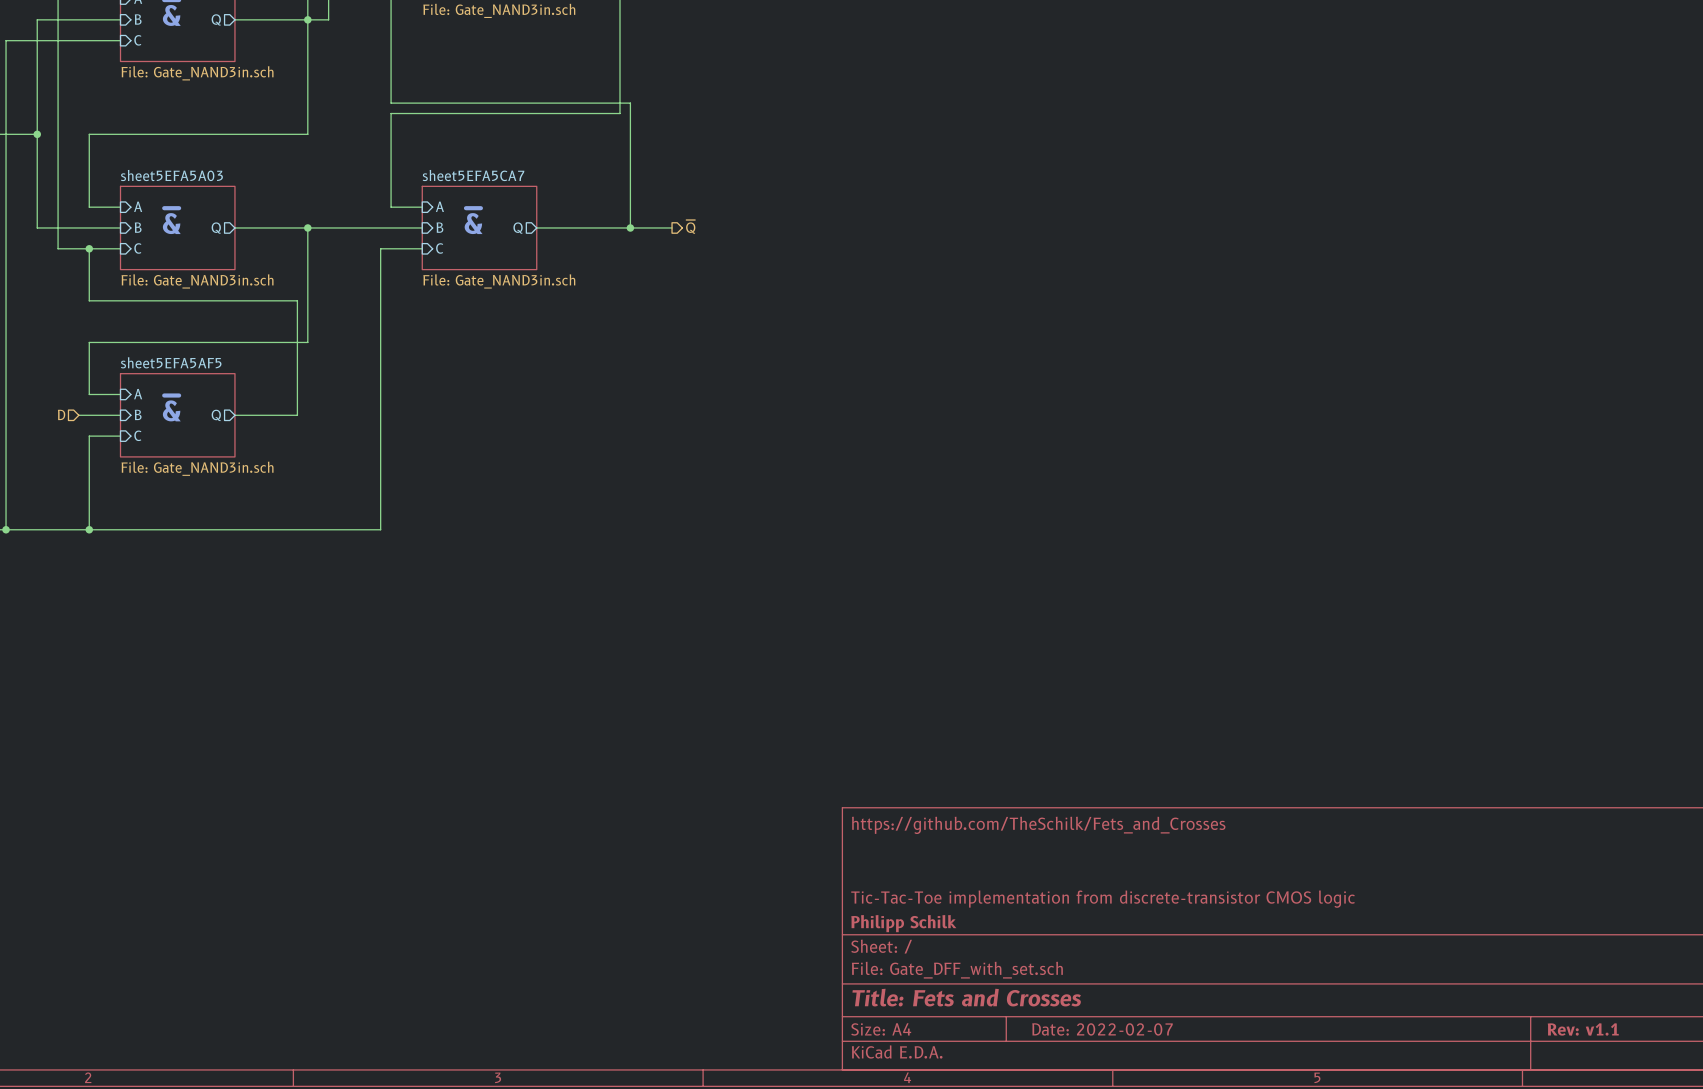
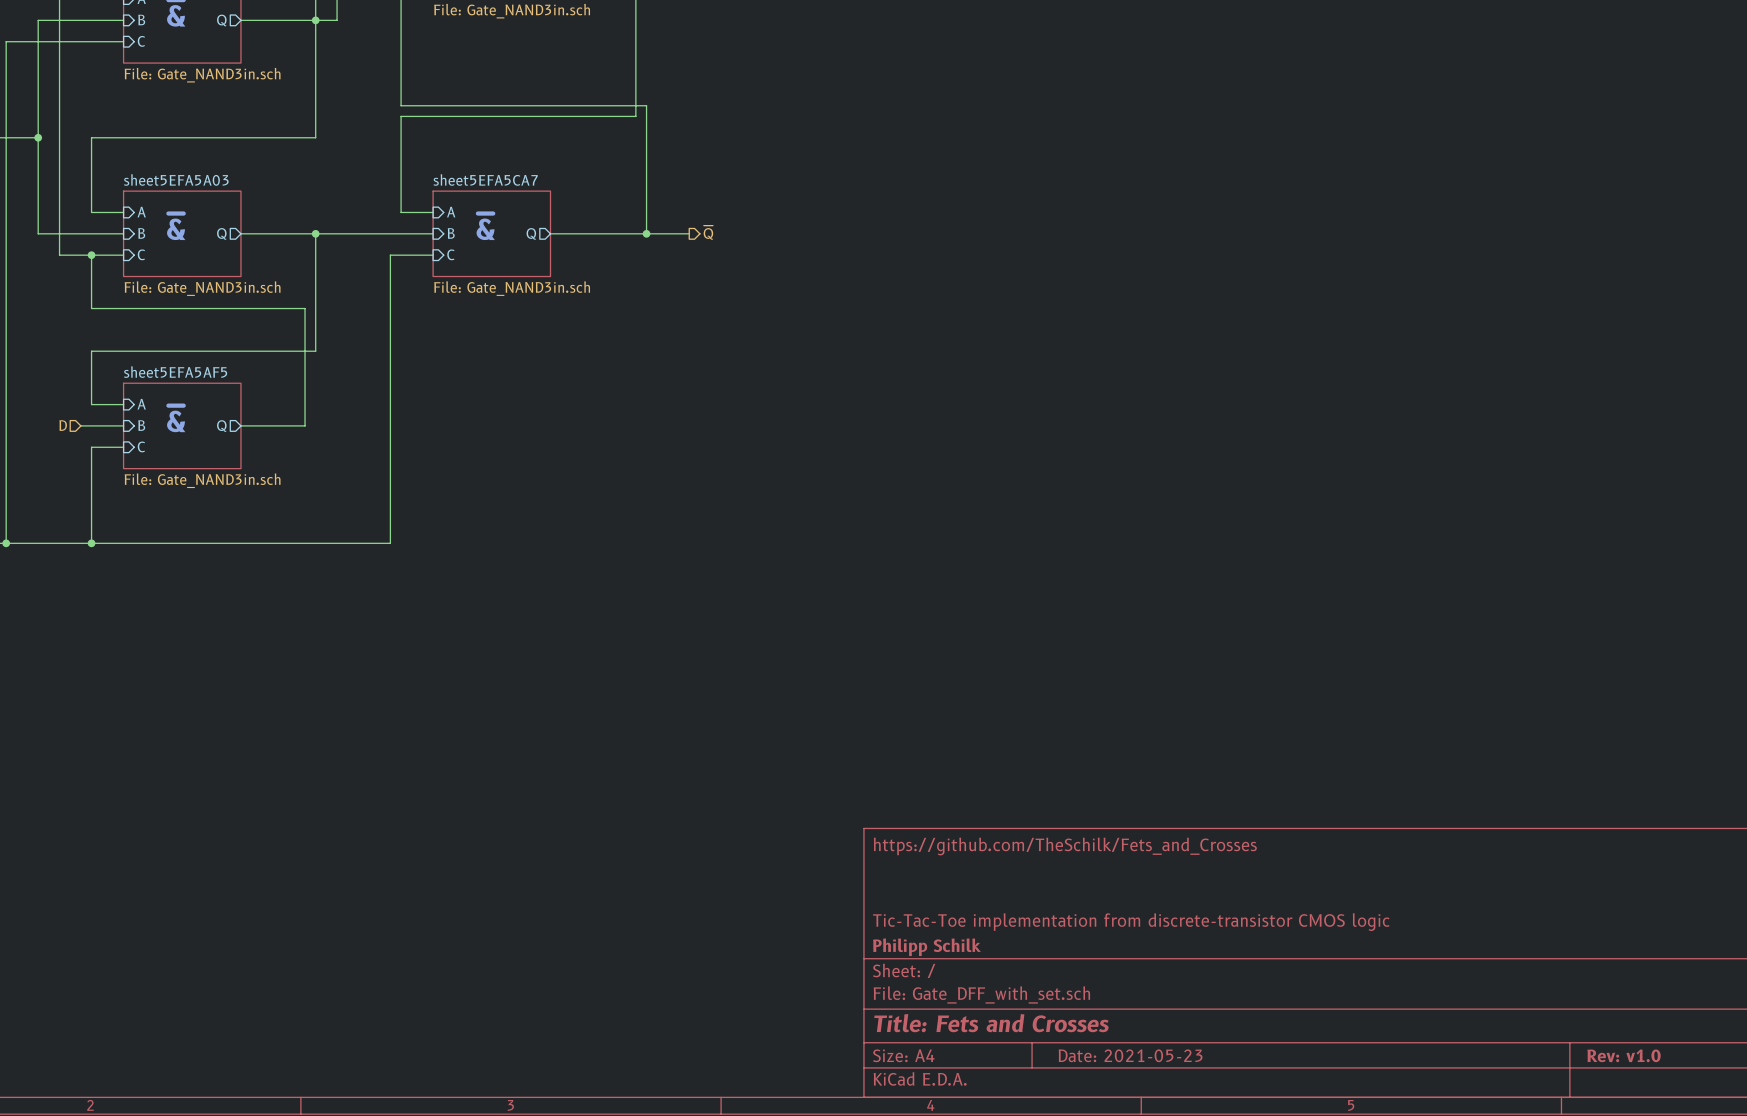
title block: Date: 2022-02-07 (1102, 1029) -> Date: 2021-05-23 (1130, 1055)
title block: Rev: v1.1 (1583, 1029) -> Rev: v1.0 (1624, 1055)

